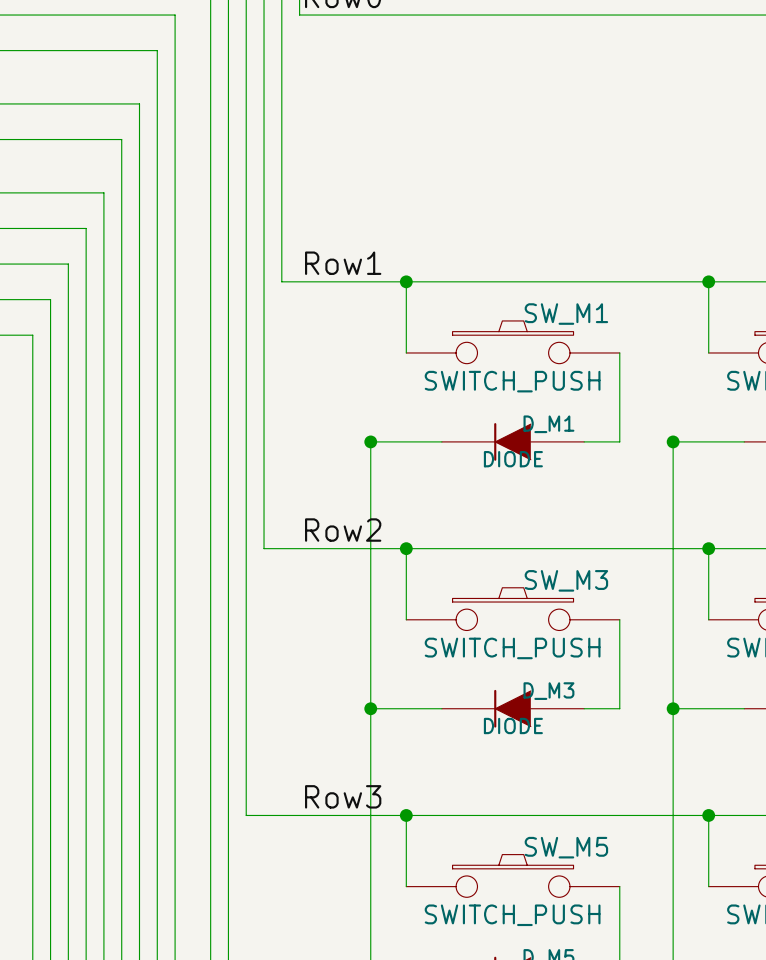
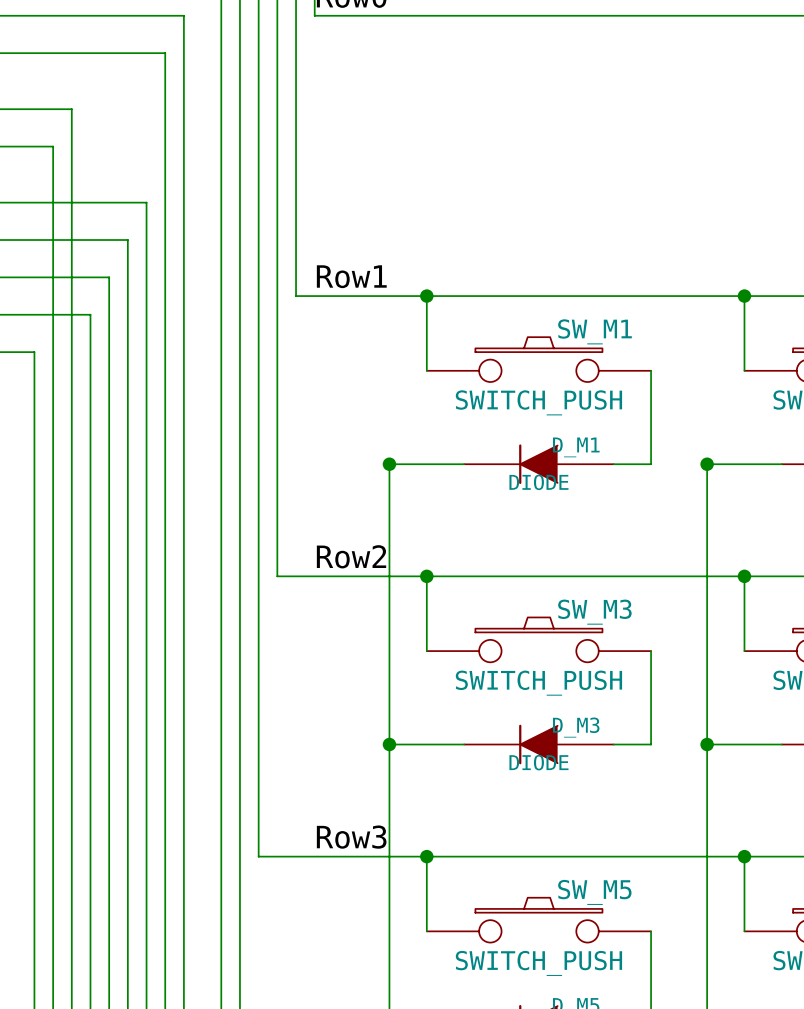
wire: (68, 103) (139, 103) (139, 192) -> (71, 109) (71, 277) (109, 277)
wire: (50, 139) (121, 139) (121, 228) -> (53, 146) (53, 314) (90, 314)
wire: (103, 192) (103, 264) -> (109, 202) (146, 202)
wire: (86, 228) (86, 299) -> (90, 240) (127, 240)

